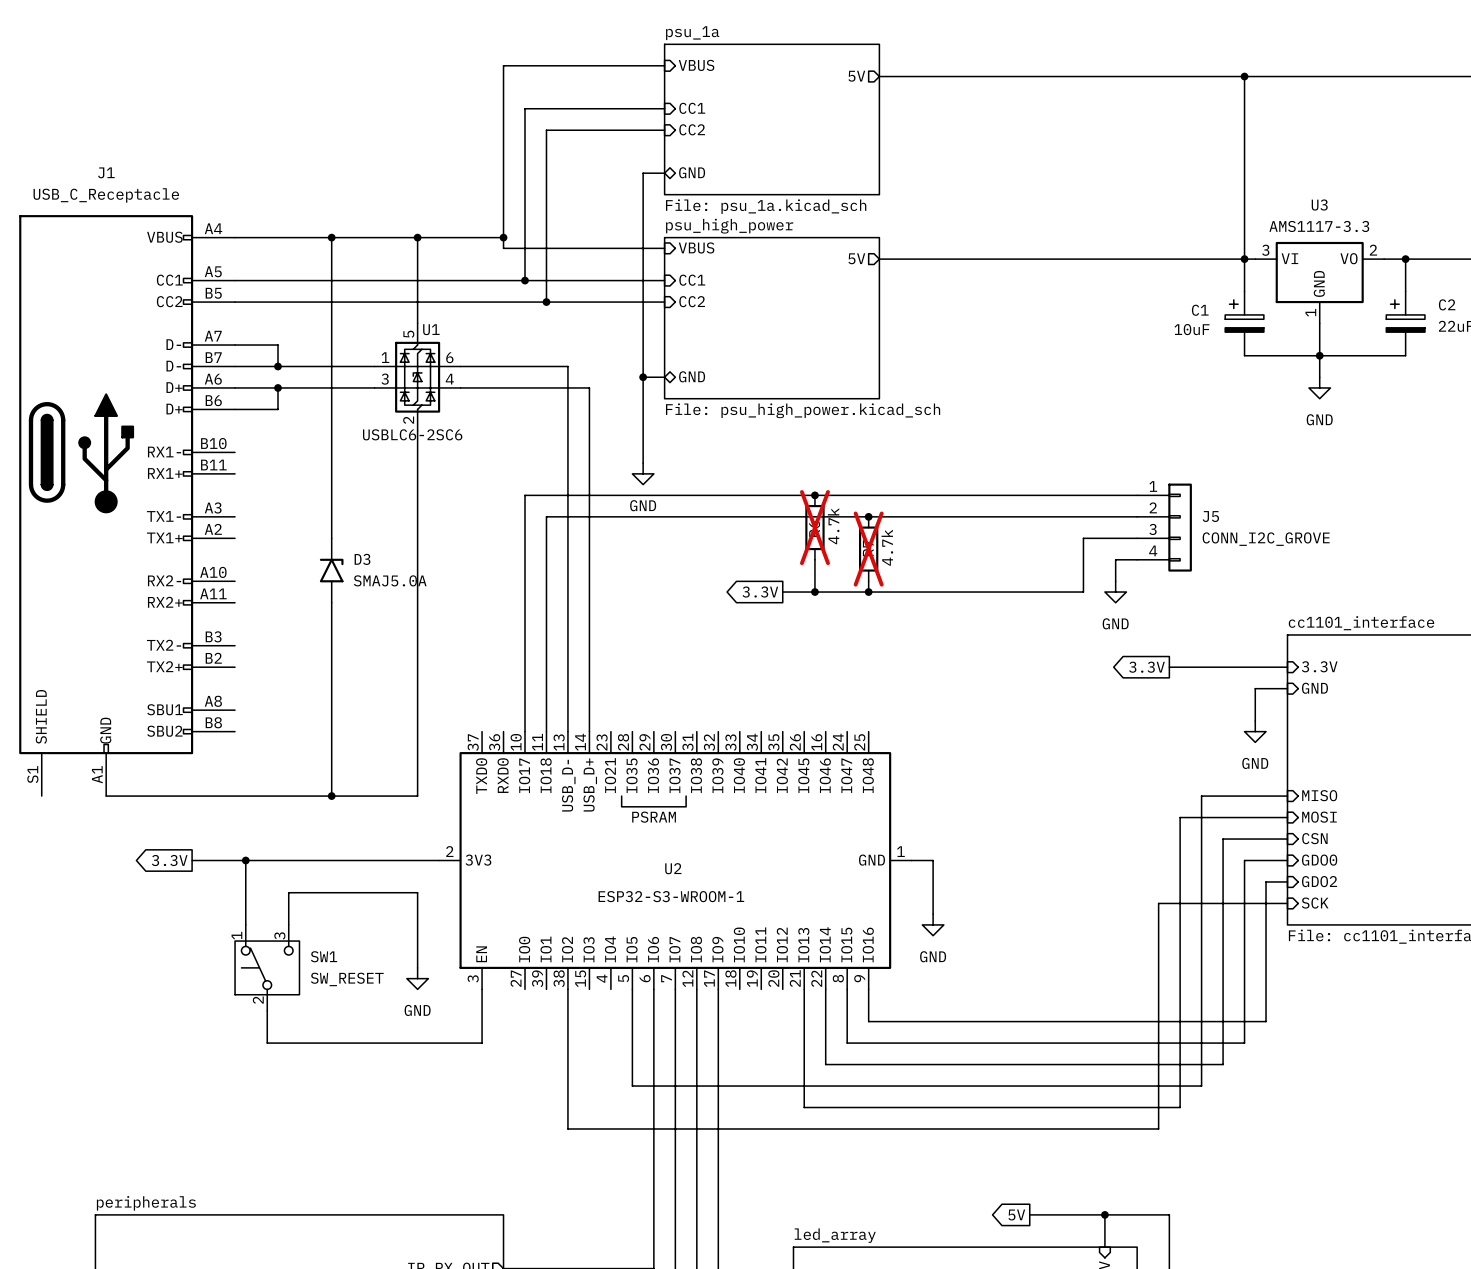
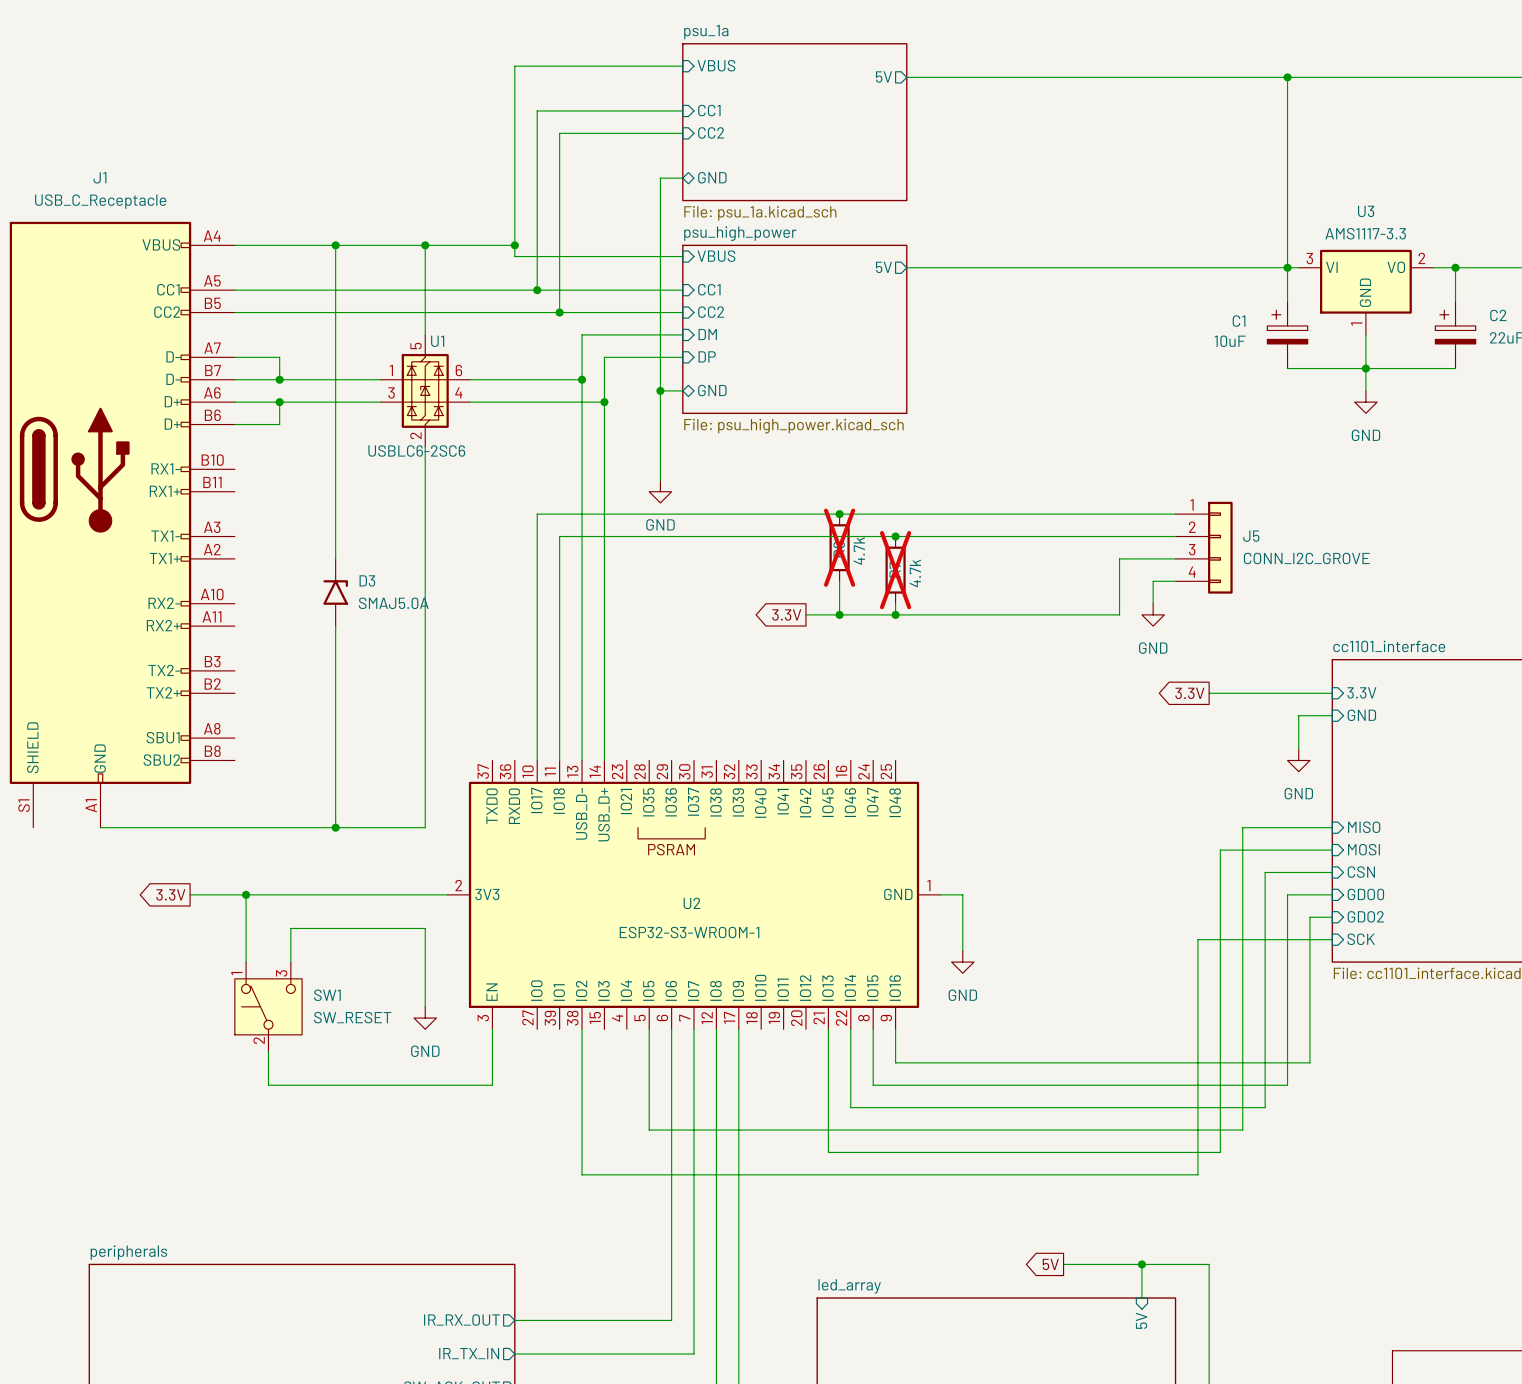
wire: none -> (682, 334) (582, 334) (582, 379)
sheet pin: none -> DM (707, 334)
sheet pin: none -> DP (707, 356)
wire: none -> (682, 357) (604, 357) (604, 402)
junction: none -> (582, 379)
junction: none -> (604, 402)

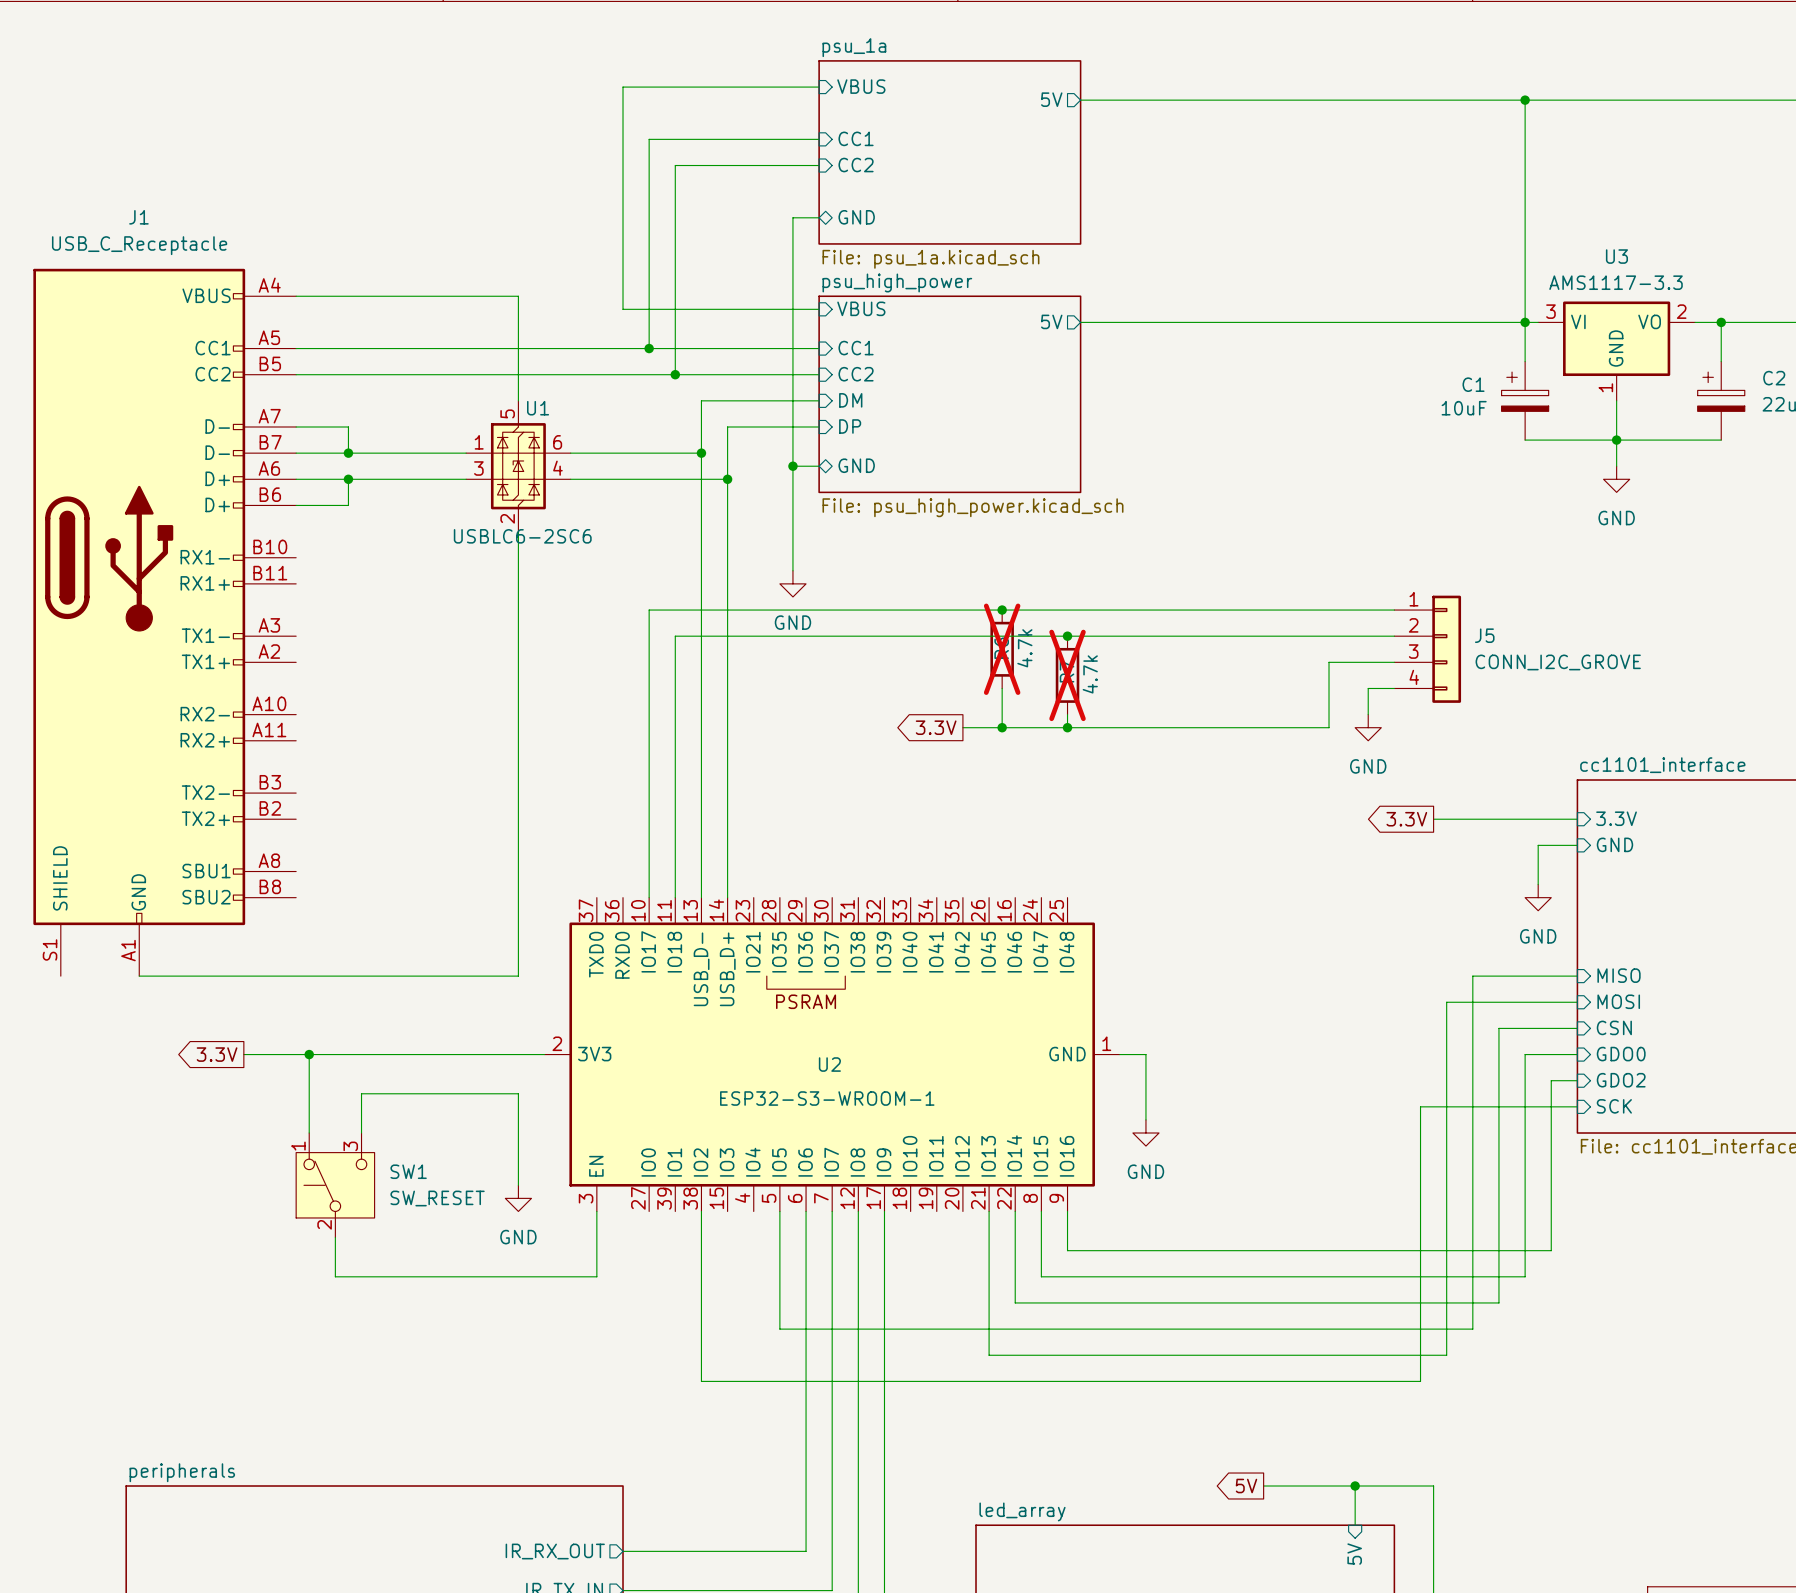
wire: (335, 245) (335, 558) -> none
junction: (335, 245) -> none
wire: (425, 245) (514, 245) -> none
junction: (425, 245) -> none
junction: (514, 245) -> none
D3: SMAJ5.0A (335, 592) -> none
wire: (335, 626) (335, 827) -> none
junction: (335, 827) -> none

